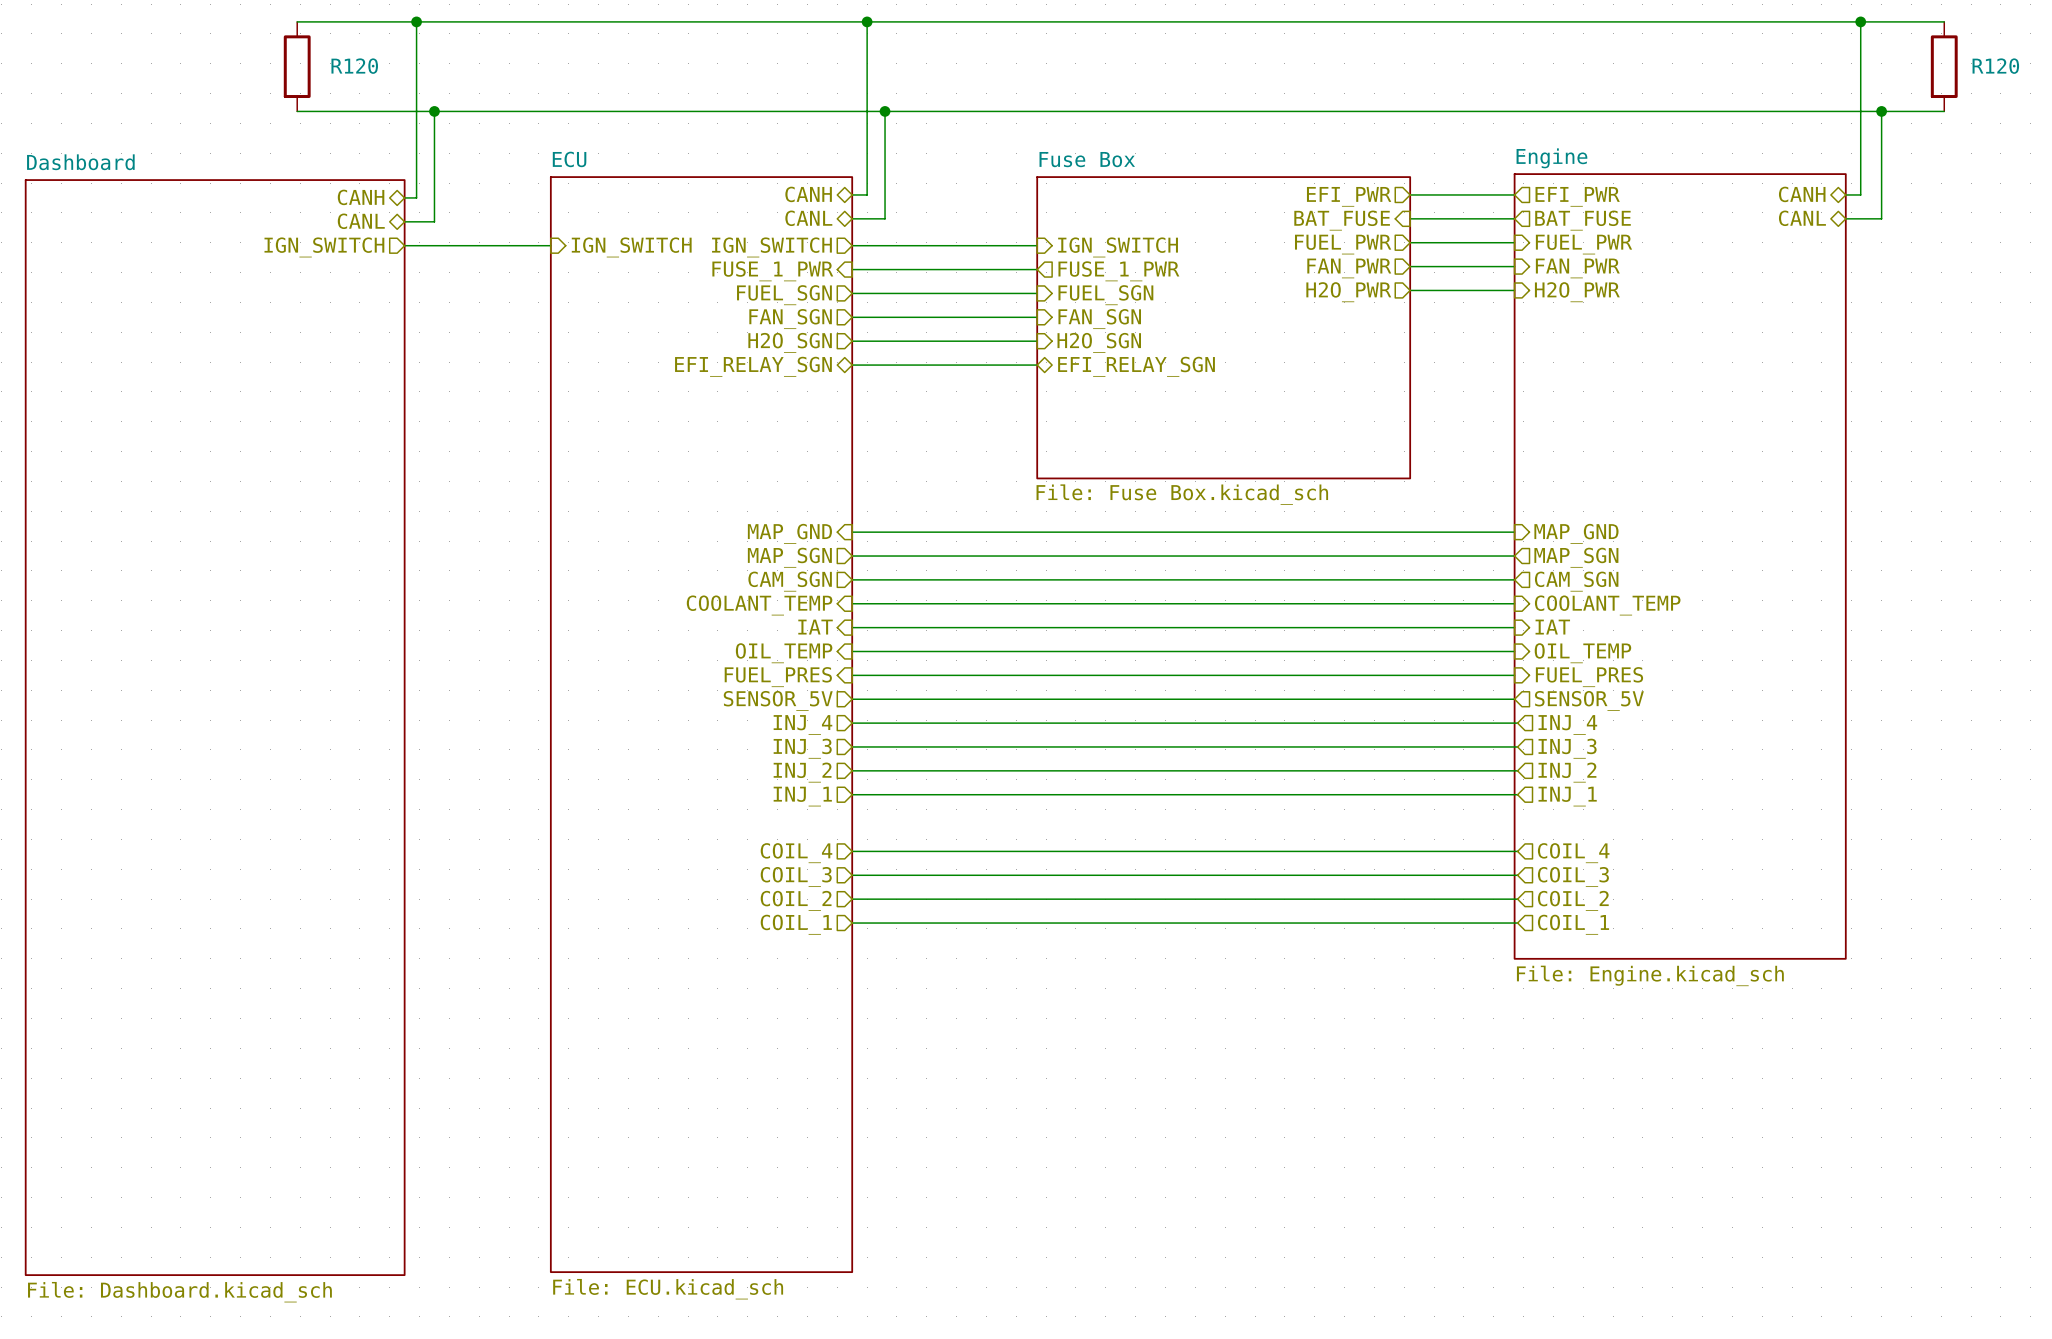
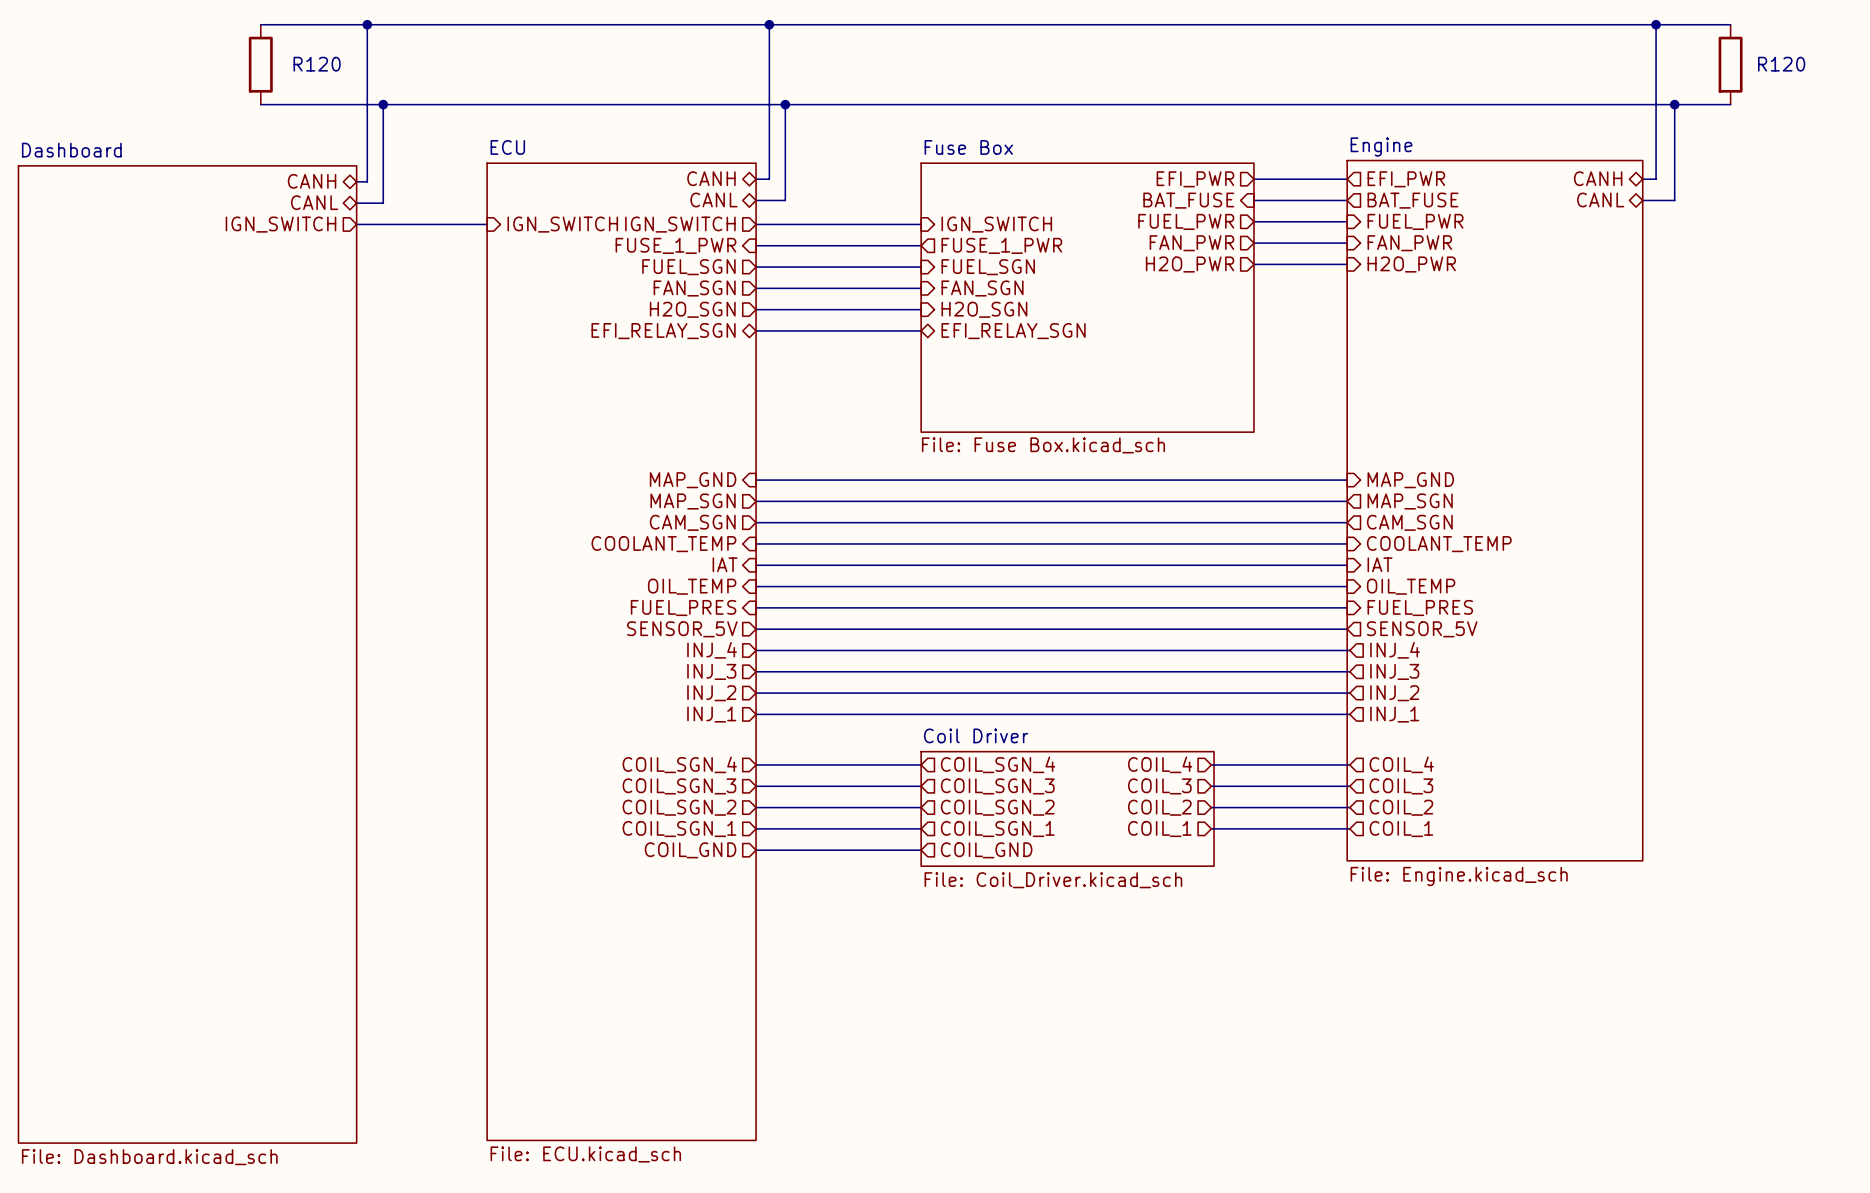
wire: (1037, 851) (1362, 851) -> none
hierarchical label: COIL_4 (796, 853) -> COIL_SGN_4 (679, 764)
hierarchical label: none -> COIL_SGN_4 (998, 764)
hierarchical label: none -> COIL_4 (1160, 764)
wire: (1037, 875) (1362, 875) -> none
hierarchical label: COIL_3 (796, 877) -> COIL_SGN_3 (679, 786)
hierarchical label: none -> COIL_SGN_3 (997, 786)
hierarchical label: none -> COIL_3 (1159, 786)
wire: (1037, 899) (1362, 899) -> none
hierarchical label: COIL_2 (796, 900) -> COIL_SGN_2 (679, 807)
hierarchical label: none -> COIL_SGN_2 (997, 807)
sheet Coil Driver: none -> File: Coil_Driver.kicad_sch (1067, 808)
hierarchical label: none -> COIL_2 (1159, 807)
wire: (1037, 923) (1362, 923) -> none
hierarchical label: COIL_1 (796, 924) -> COIL_SGN_1 (679, 829)
hierarchical label: none -> COIL_SGN_1 (997, 829)
hierarchical label: none -> COIL_1 (1159, 829)
wire: none -> (756, 850) (921, 850)
hierarchical label: none -> COIL_GND (690, 850)
hierarchical label: none -> COIL_GND (986, 850)

